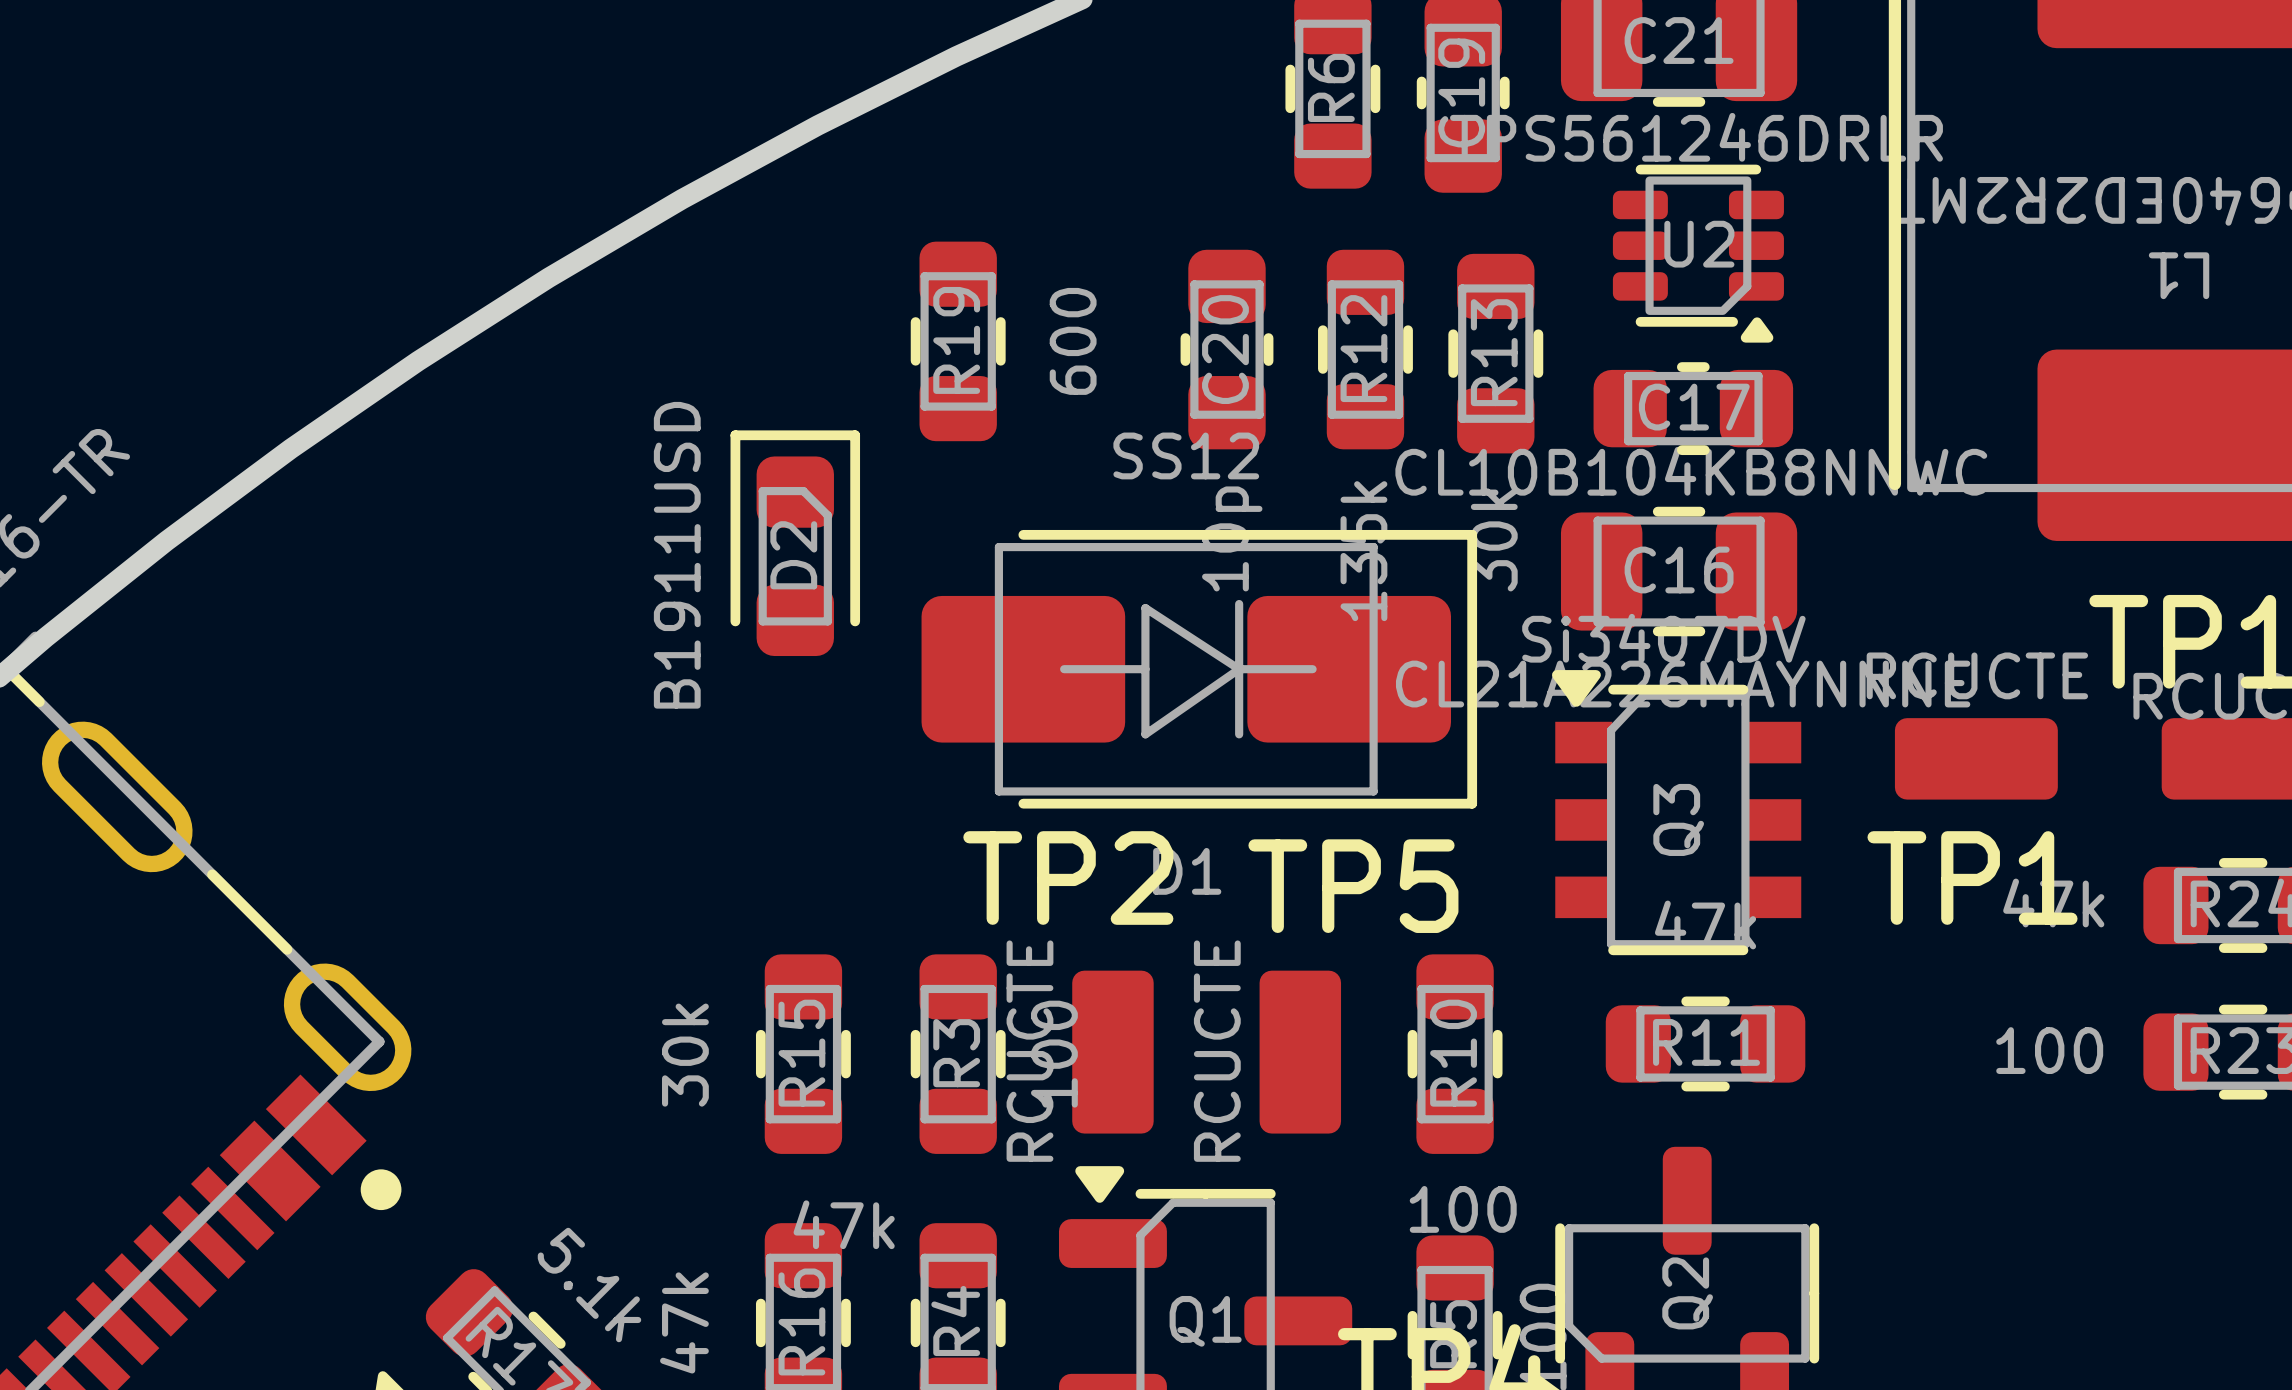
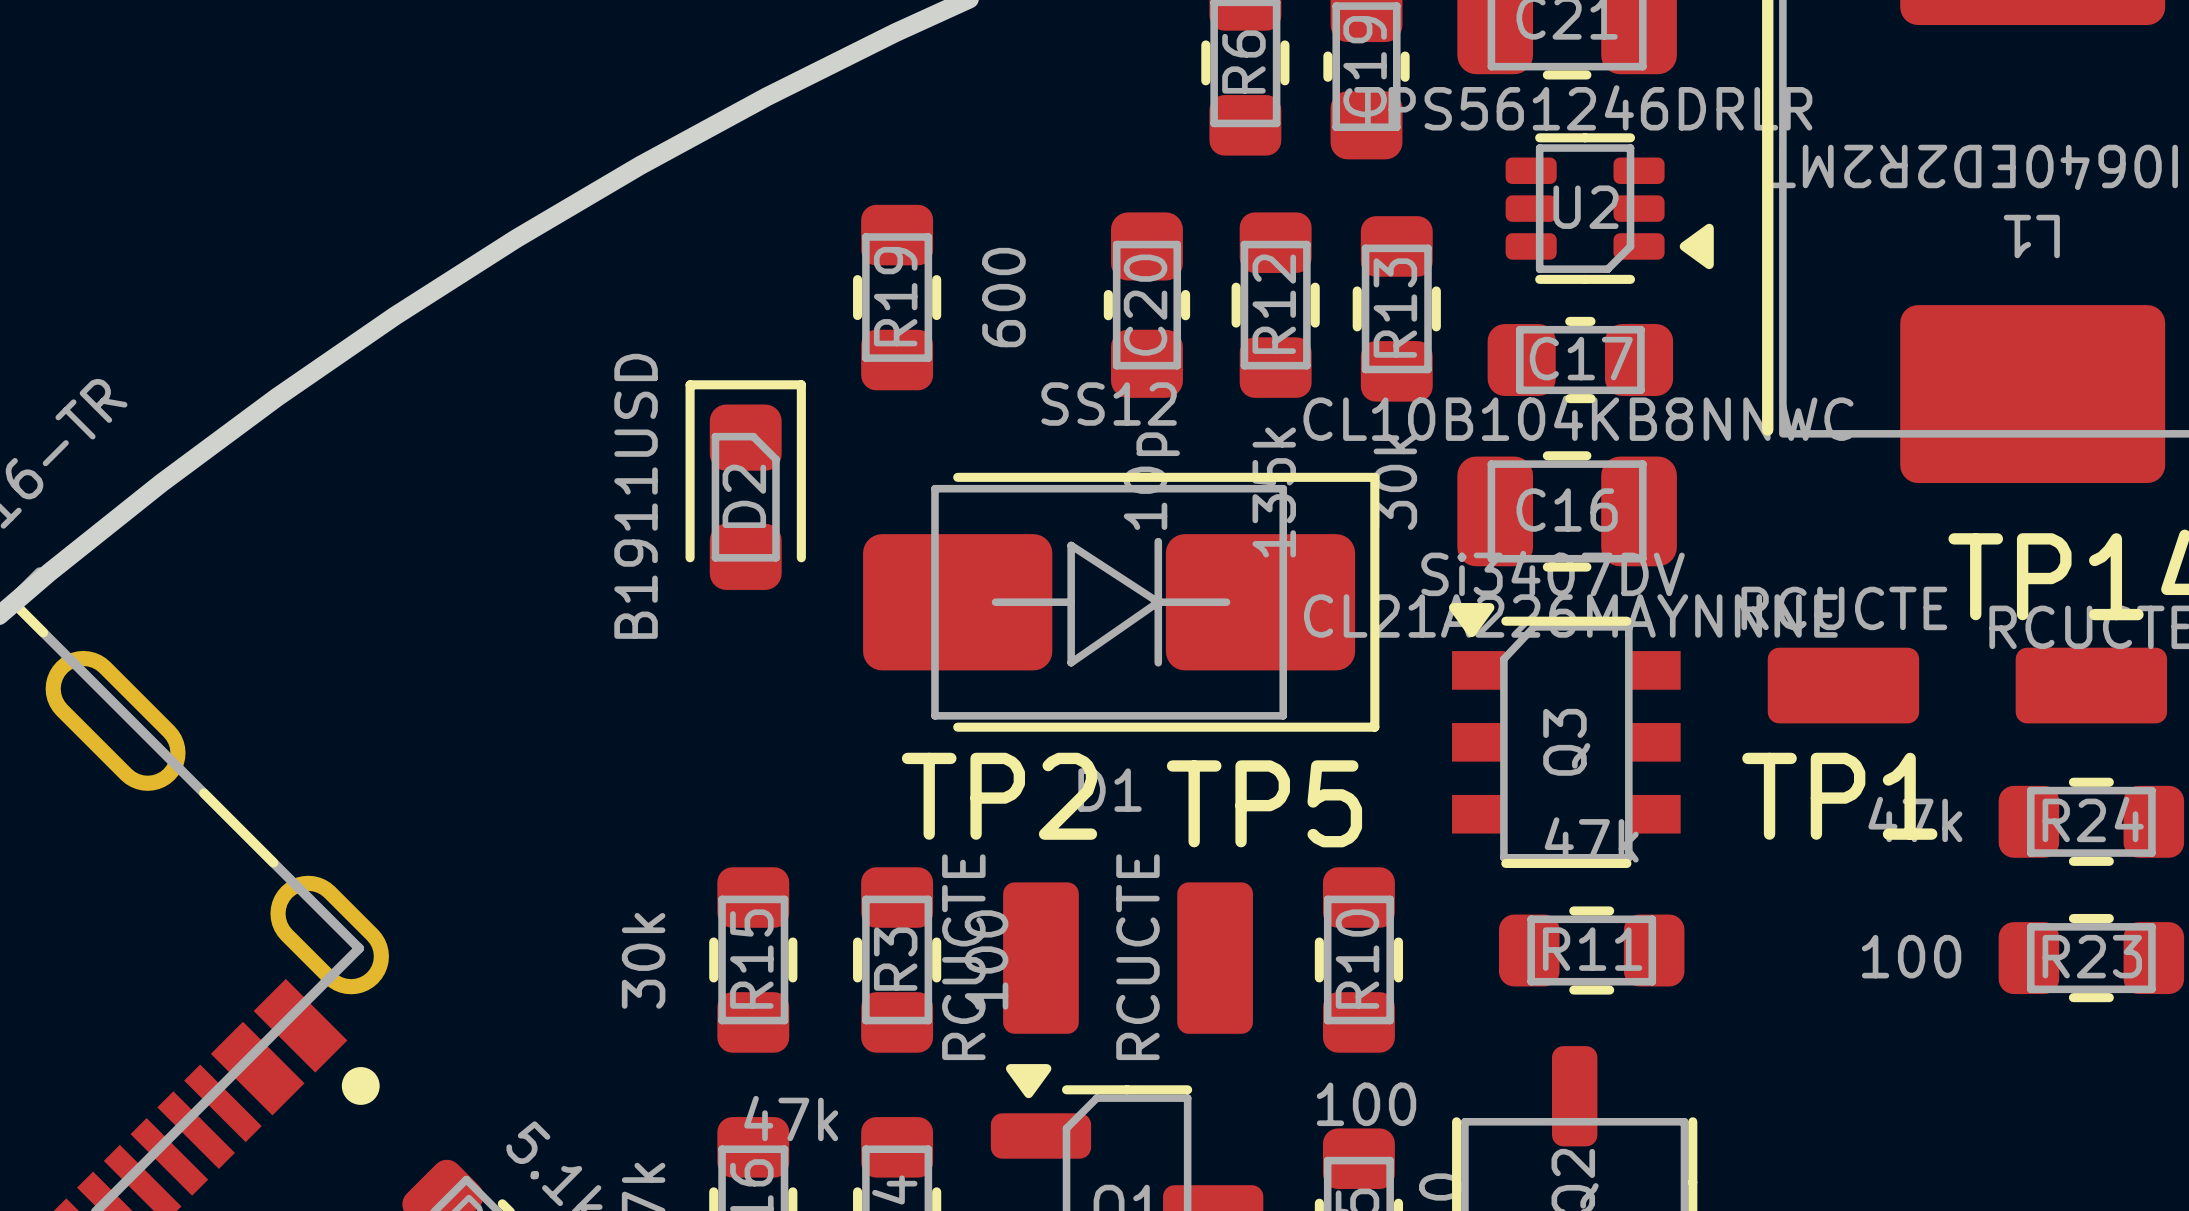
U2 footprint: [1612, 164, 1784, 343] -> [1505, 133, 1714, 284]

